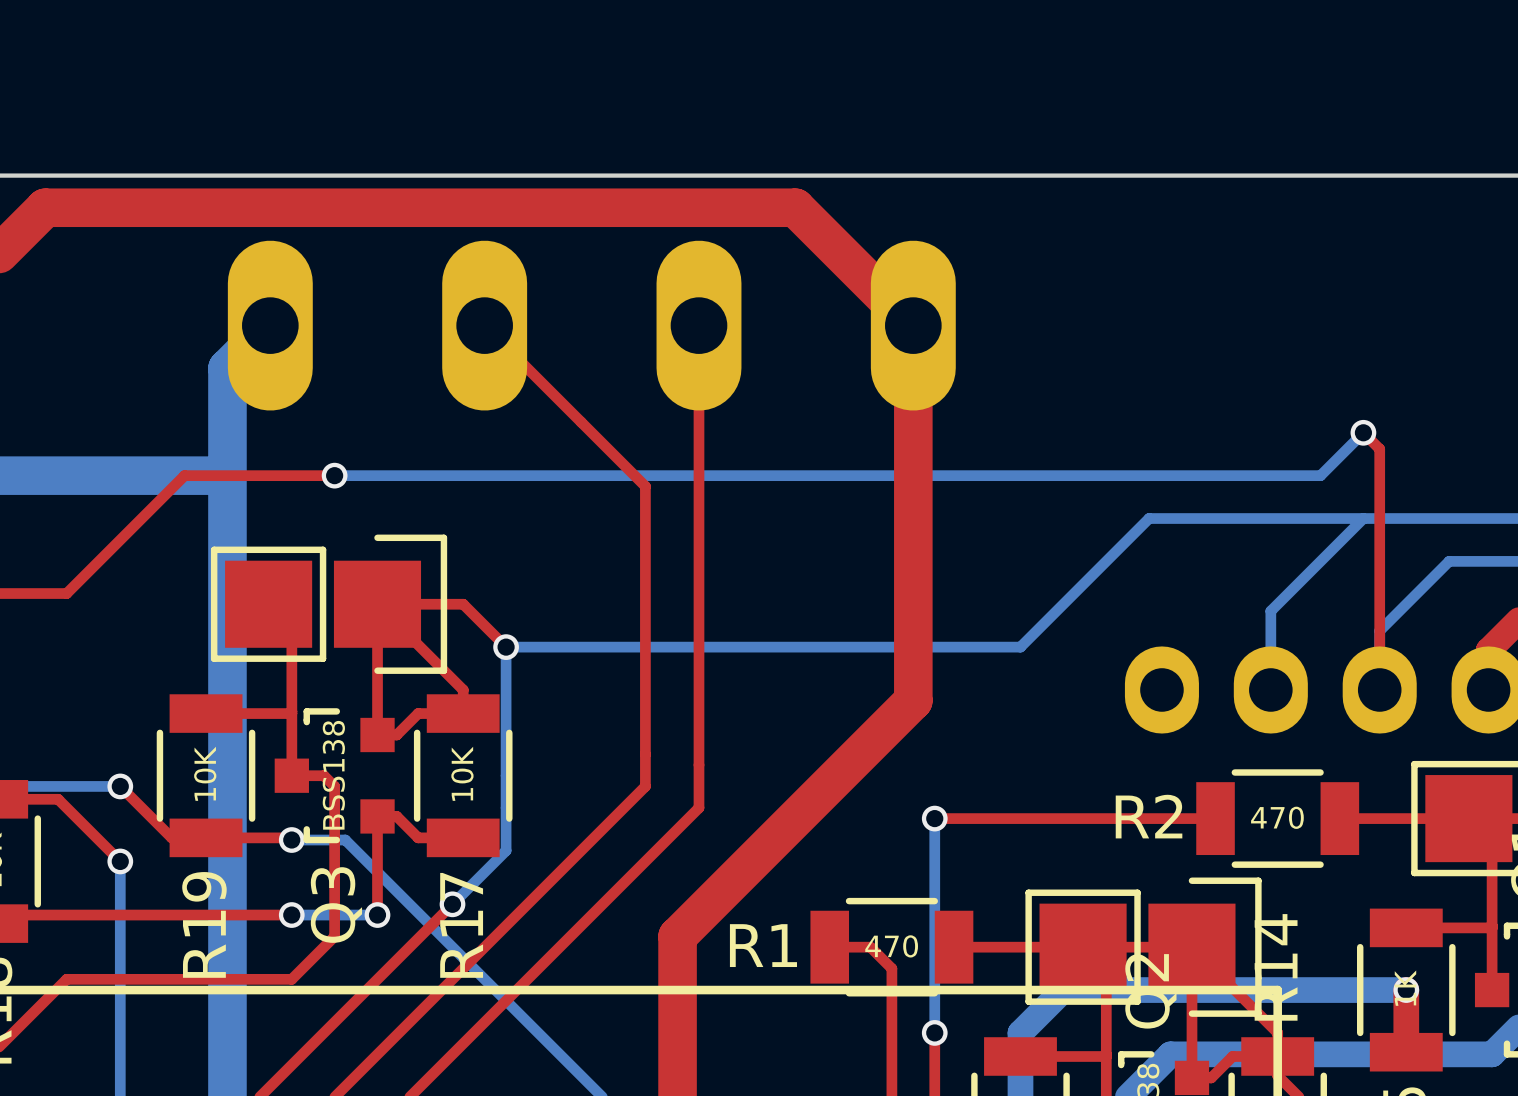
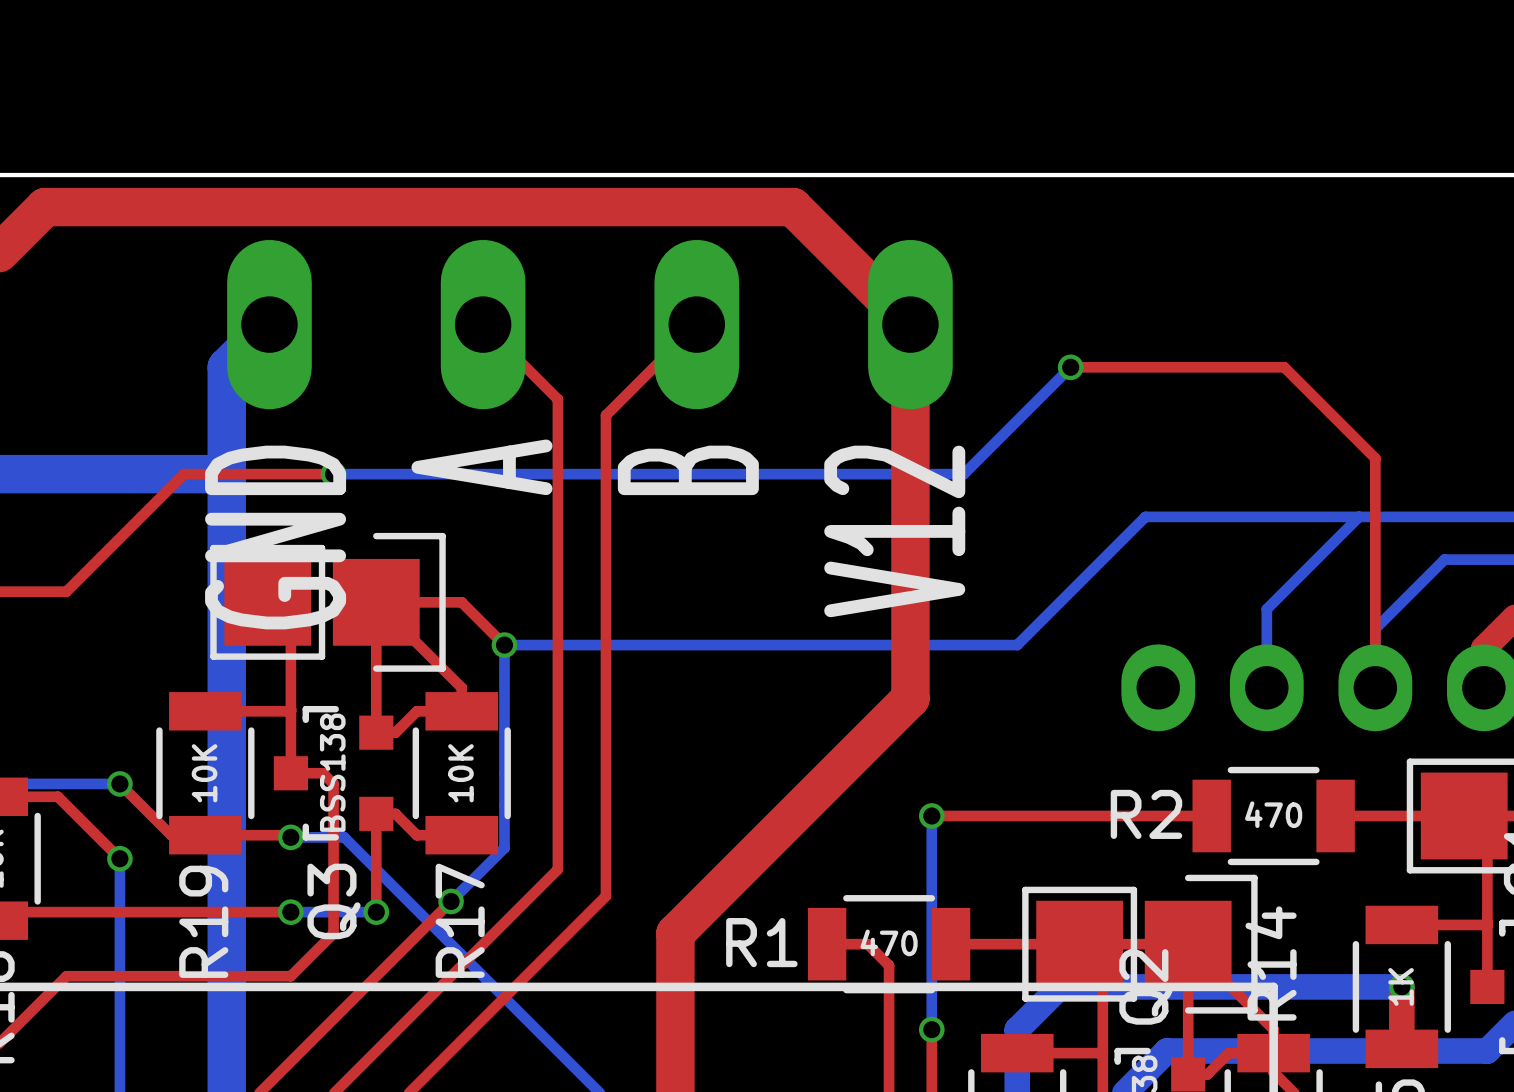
top track: (698, 325) (698, 807) (607, 898) -> (696, 324) (605, 415) (605, 896)
via: none -> (1070, 367)
top track: (559, 400) (645, 486) (645, 786) (559, 872) -> (557, 399) (557, 869)
top track: (1363, 432) (1379, 449) (1379, 459) -> (1070, 367) (1284, 367) (1375, 458)
bottom track: (1363, 432) (1320, 475) (966, 475) -> (1070, 367) (963, 474)
via: (1363, 432) -> none
text: none -> B (688, 470)
text: none -> A (481, 467)
text: none -> V12 (894, 531)
text: none -> GND (275, 537)

